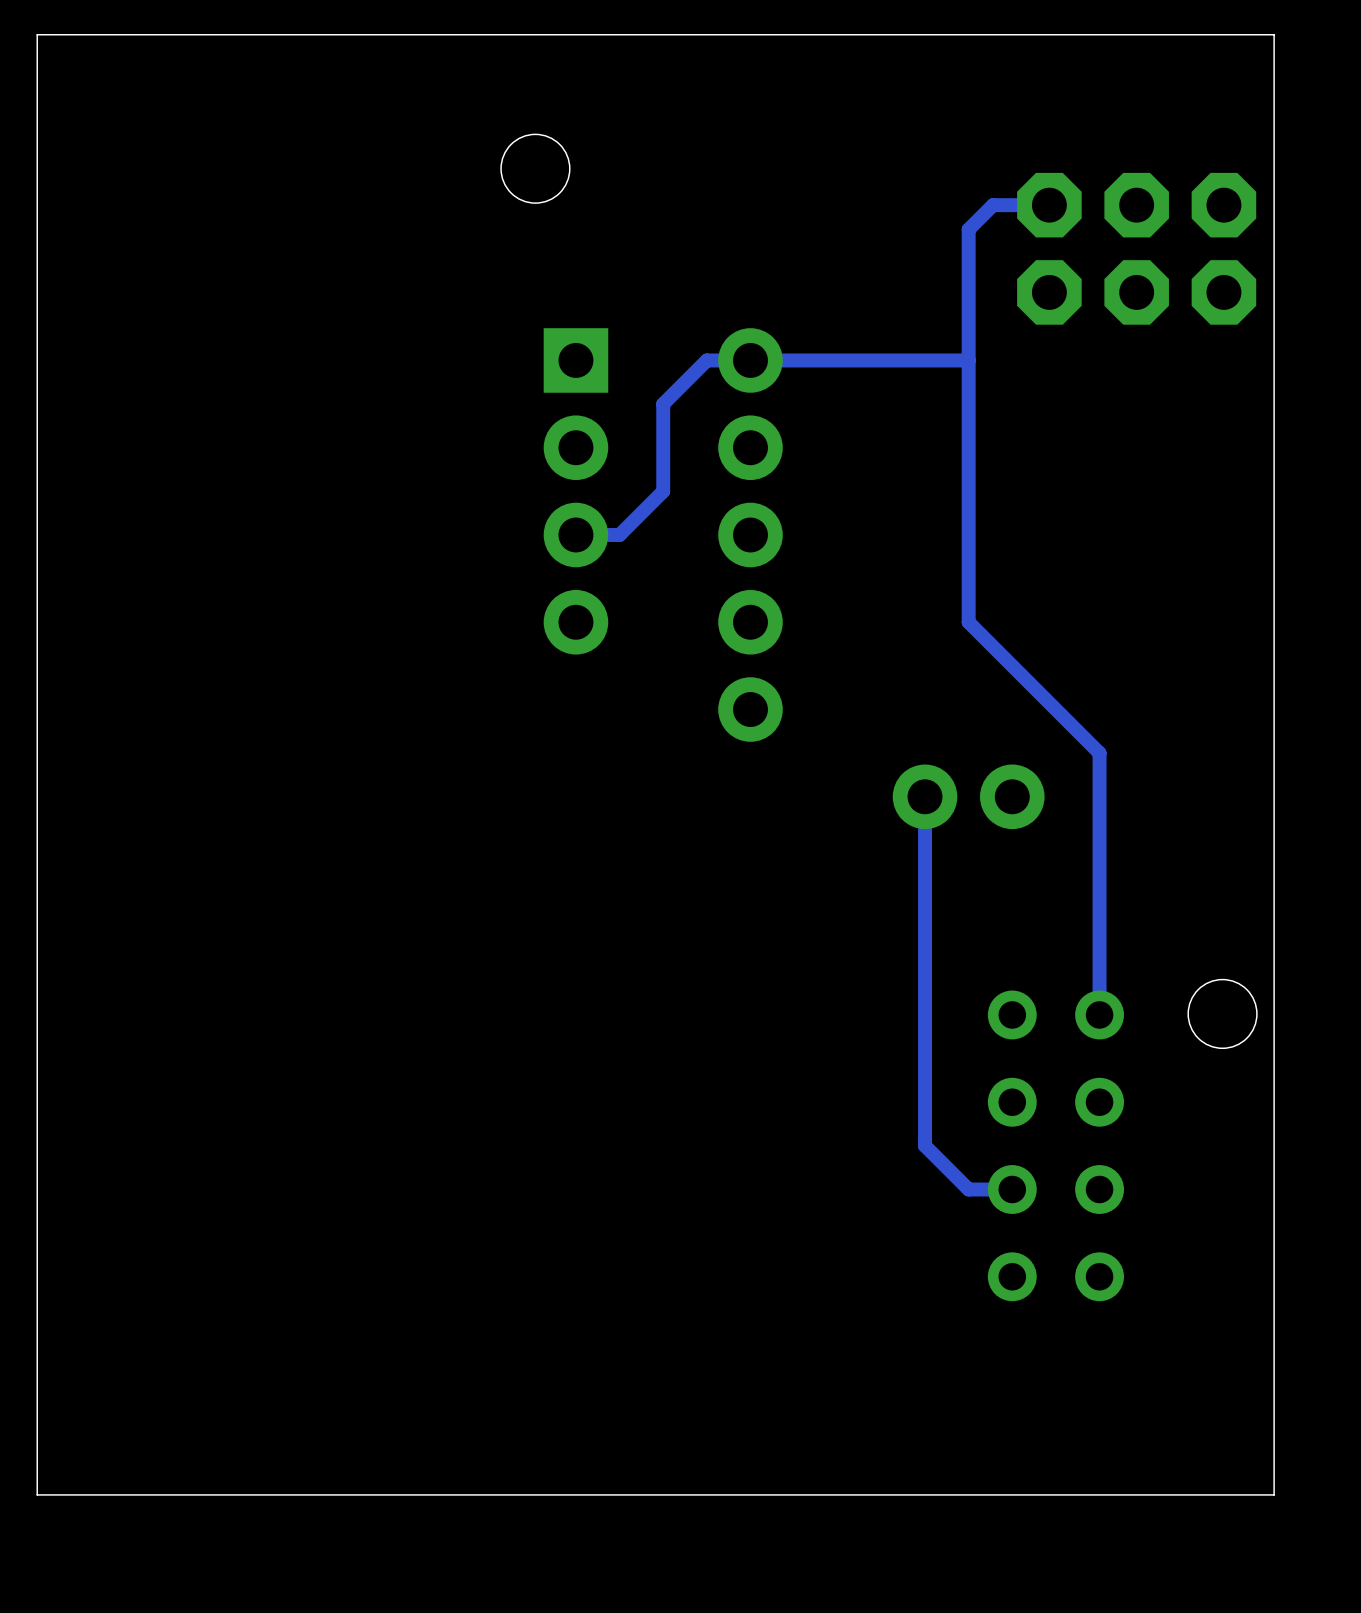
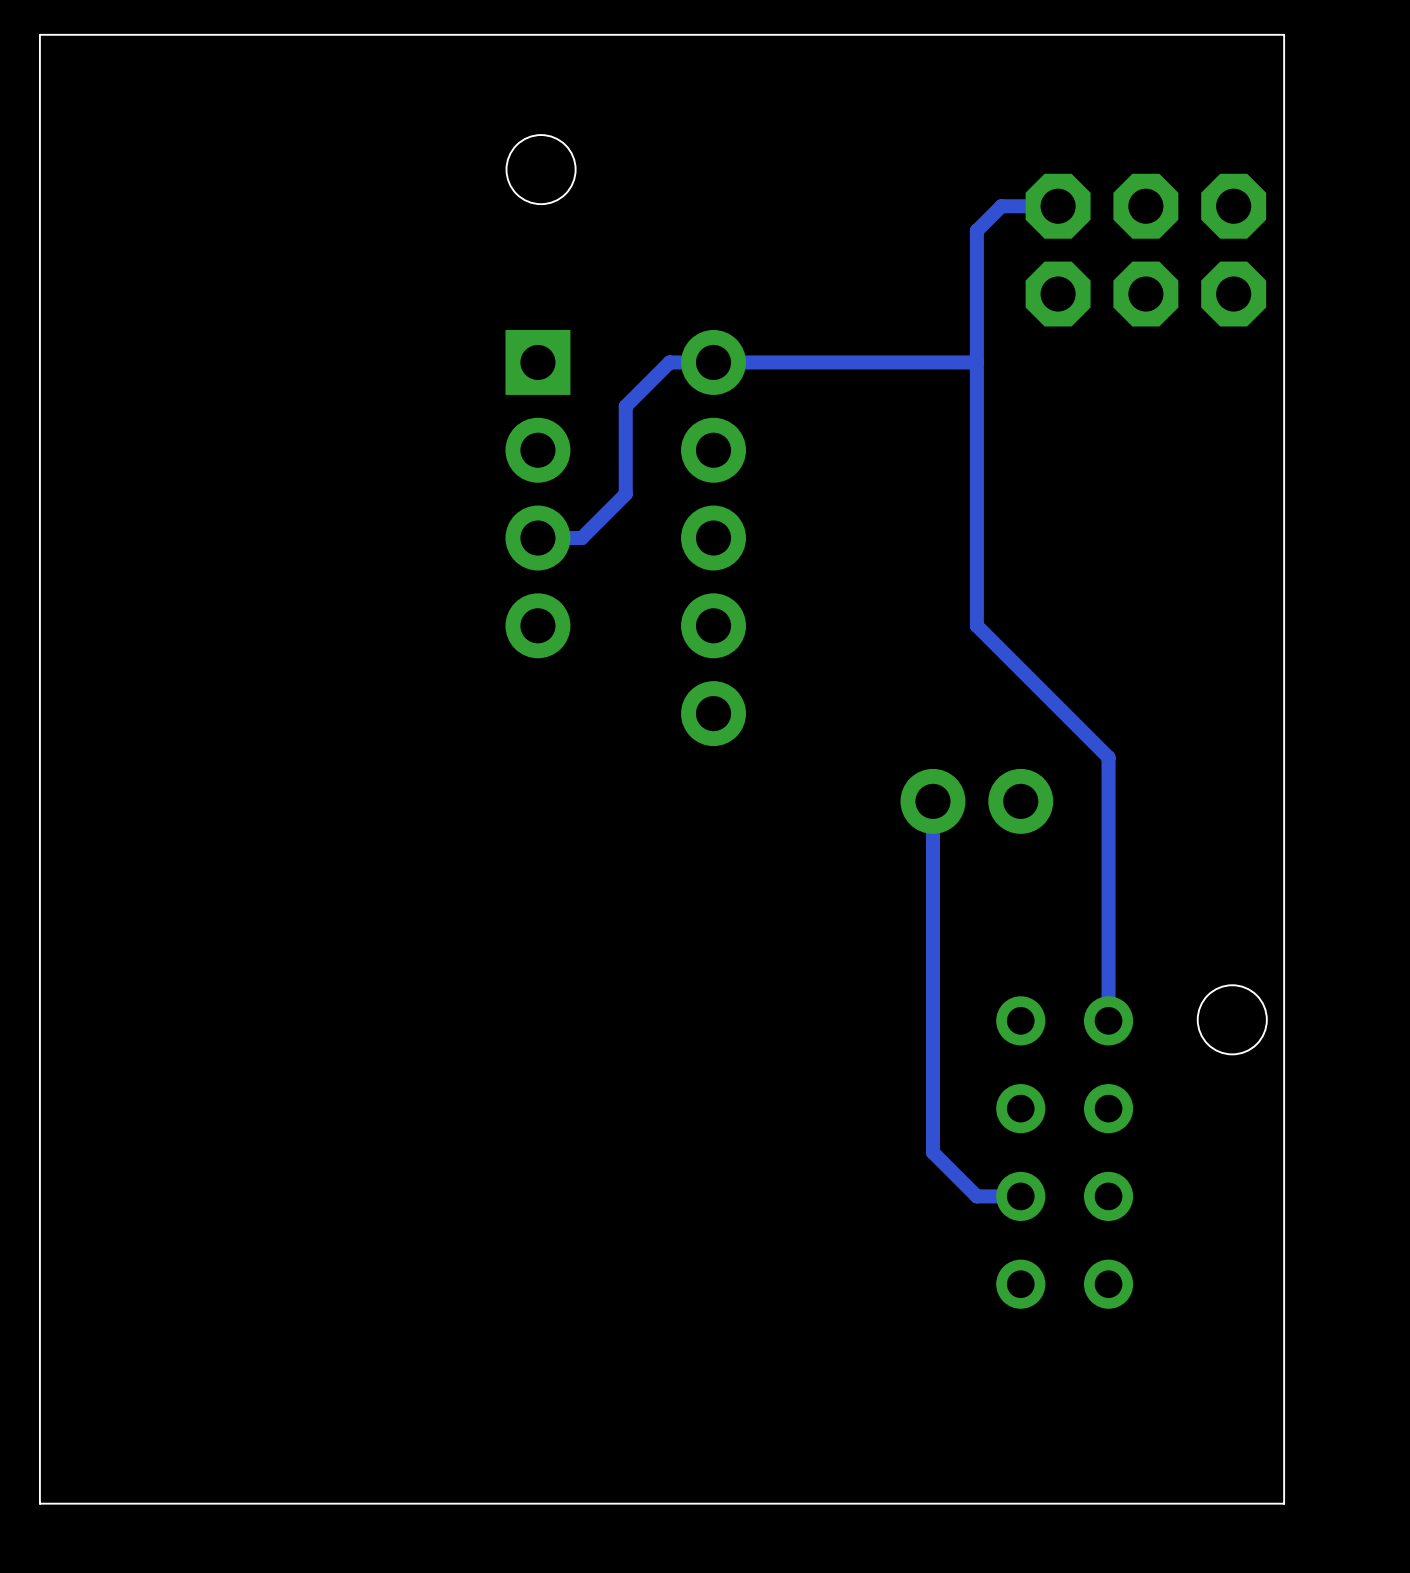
track: (706, 360) (663, 404) (663, 491) (619, 534) (575, 534) -> (713, 362) (669, 362) (625, 406) (625, 494) (581, 538) (537, 538)
part position: (575, 491) -> (537, 494)
part position: (750, 534) -> (713, 538)

